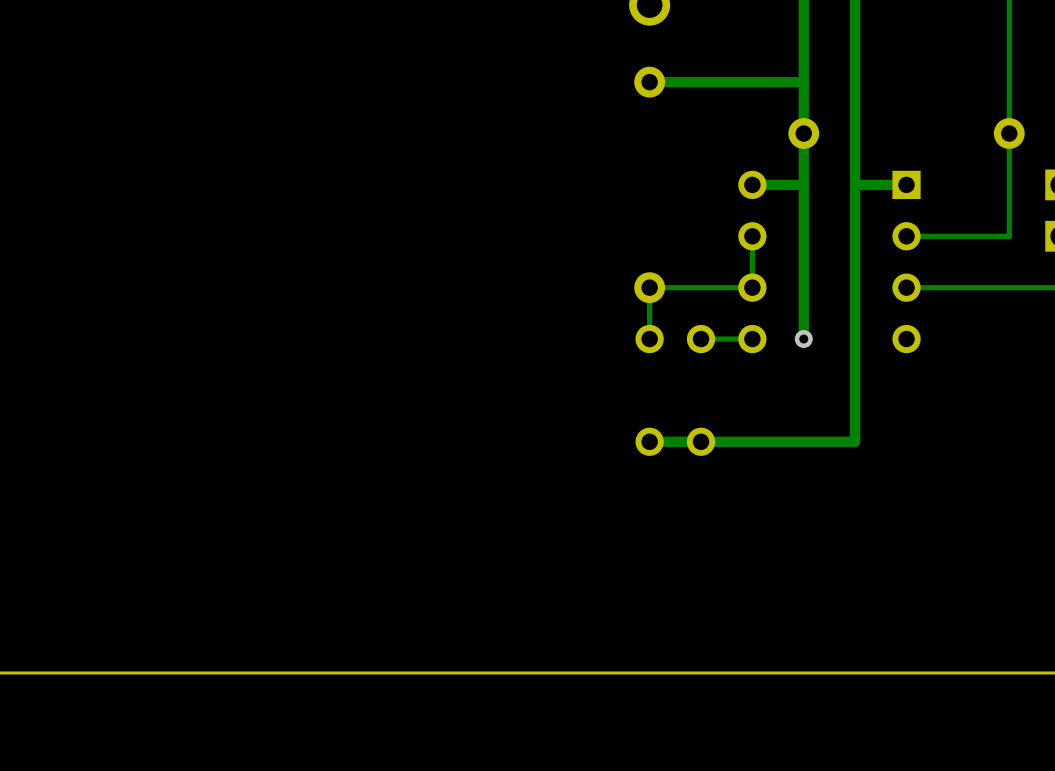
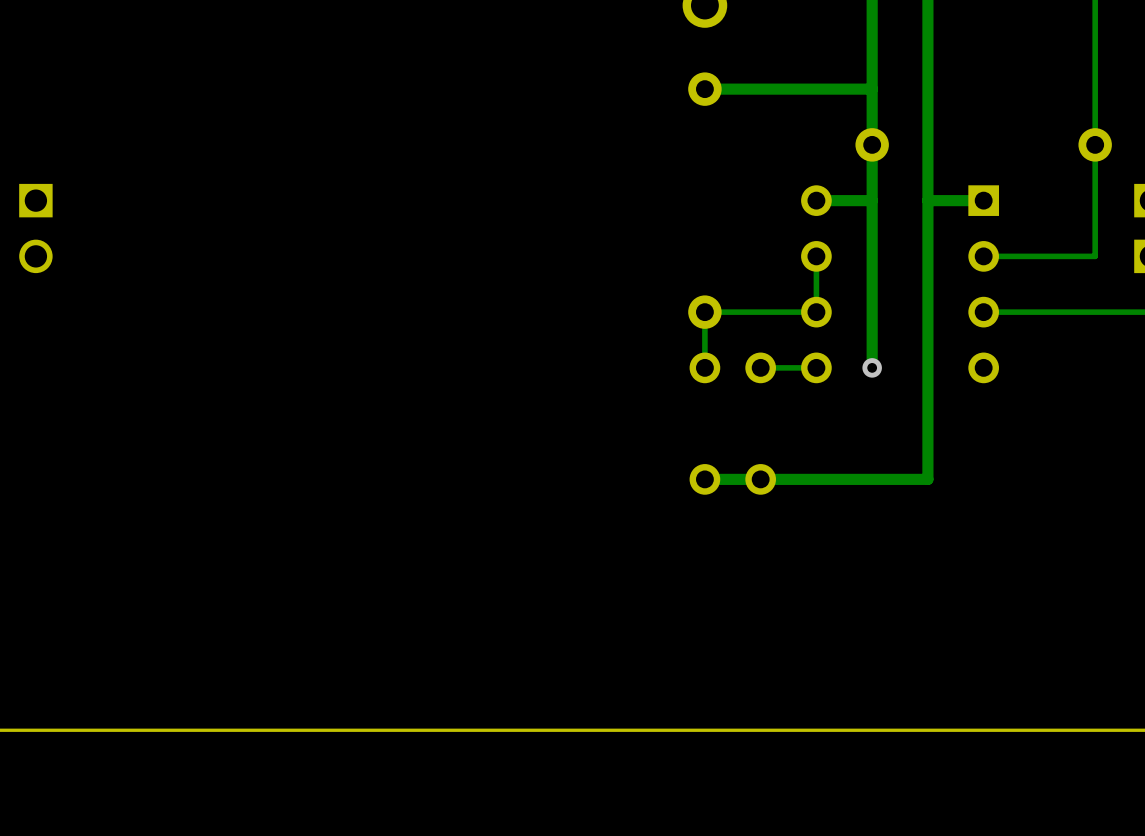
part: none -> (35, 228)

